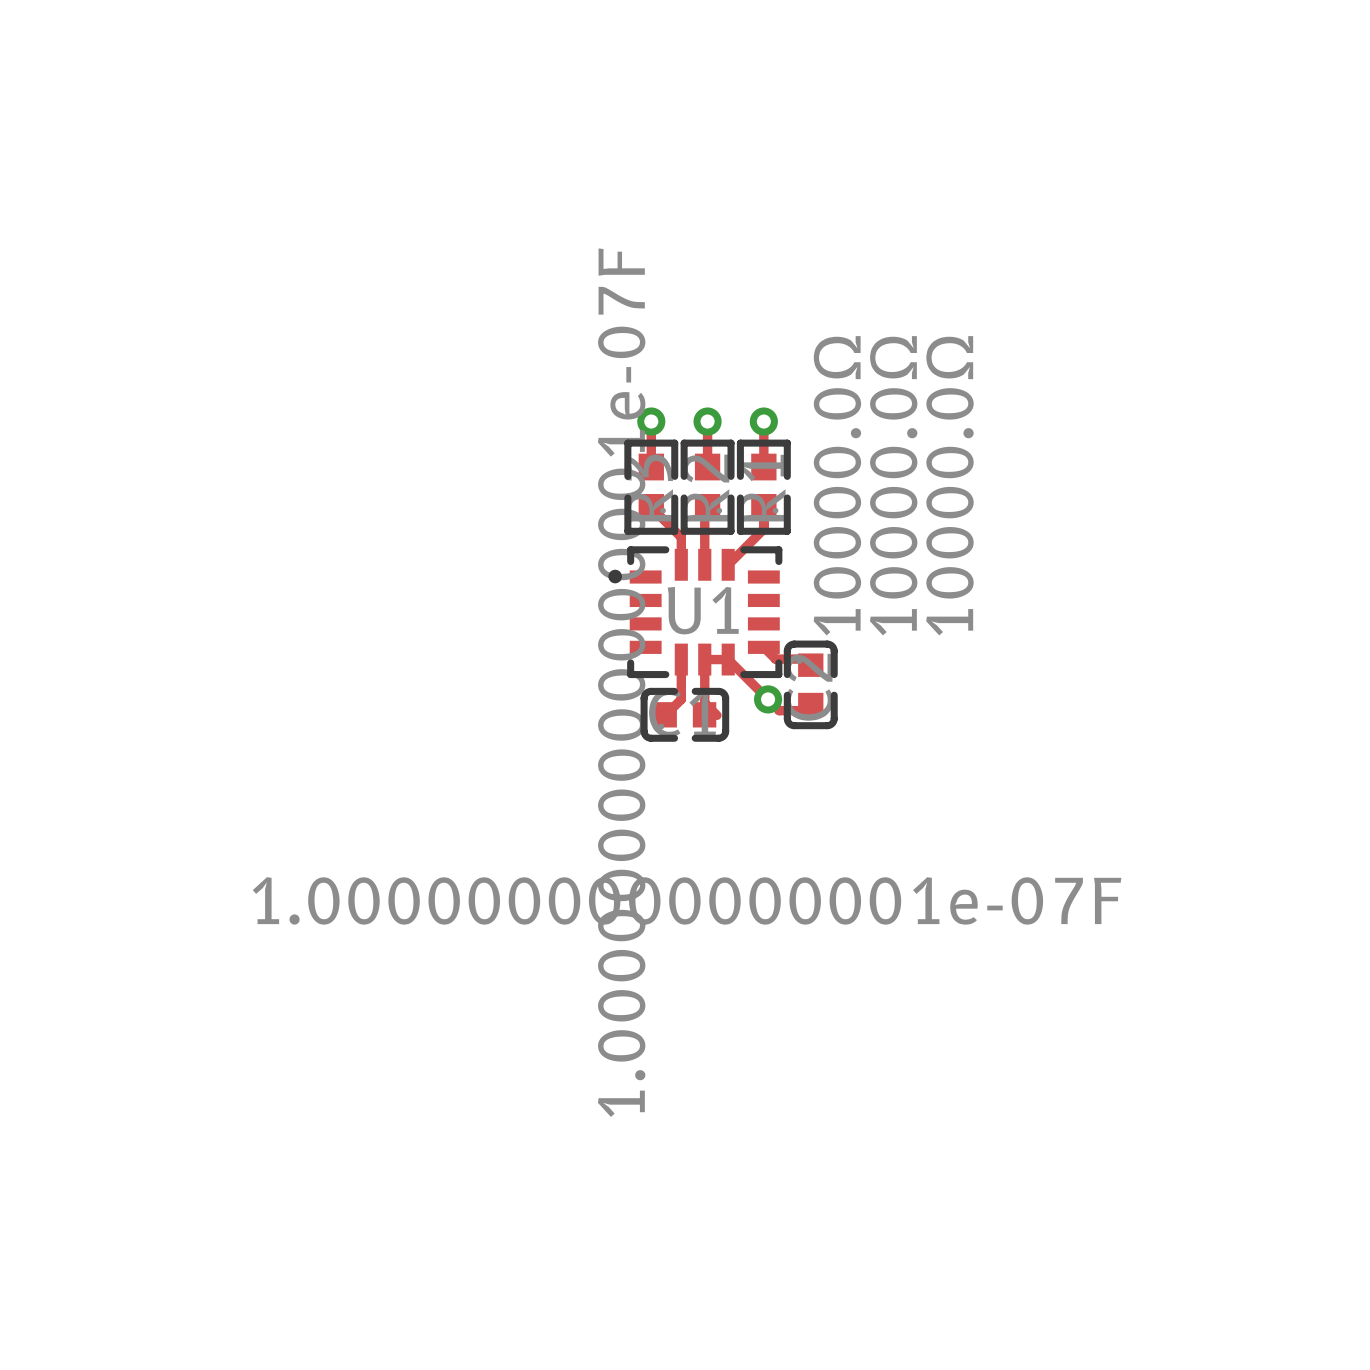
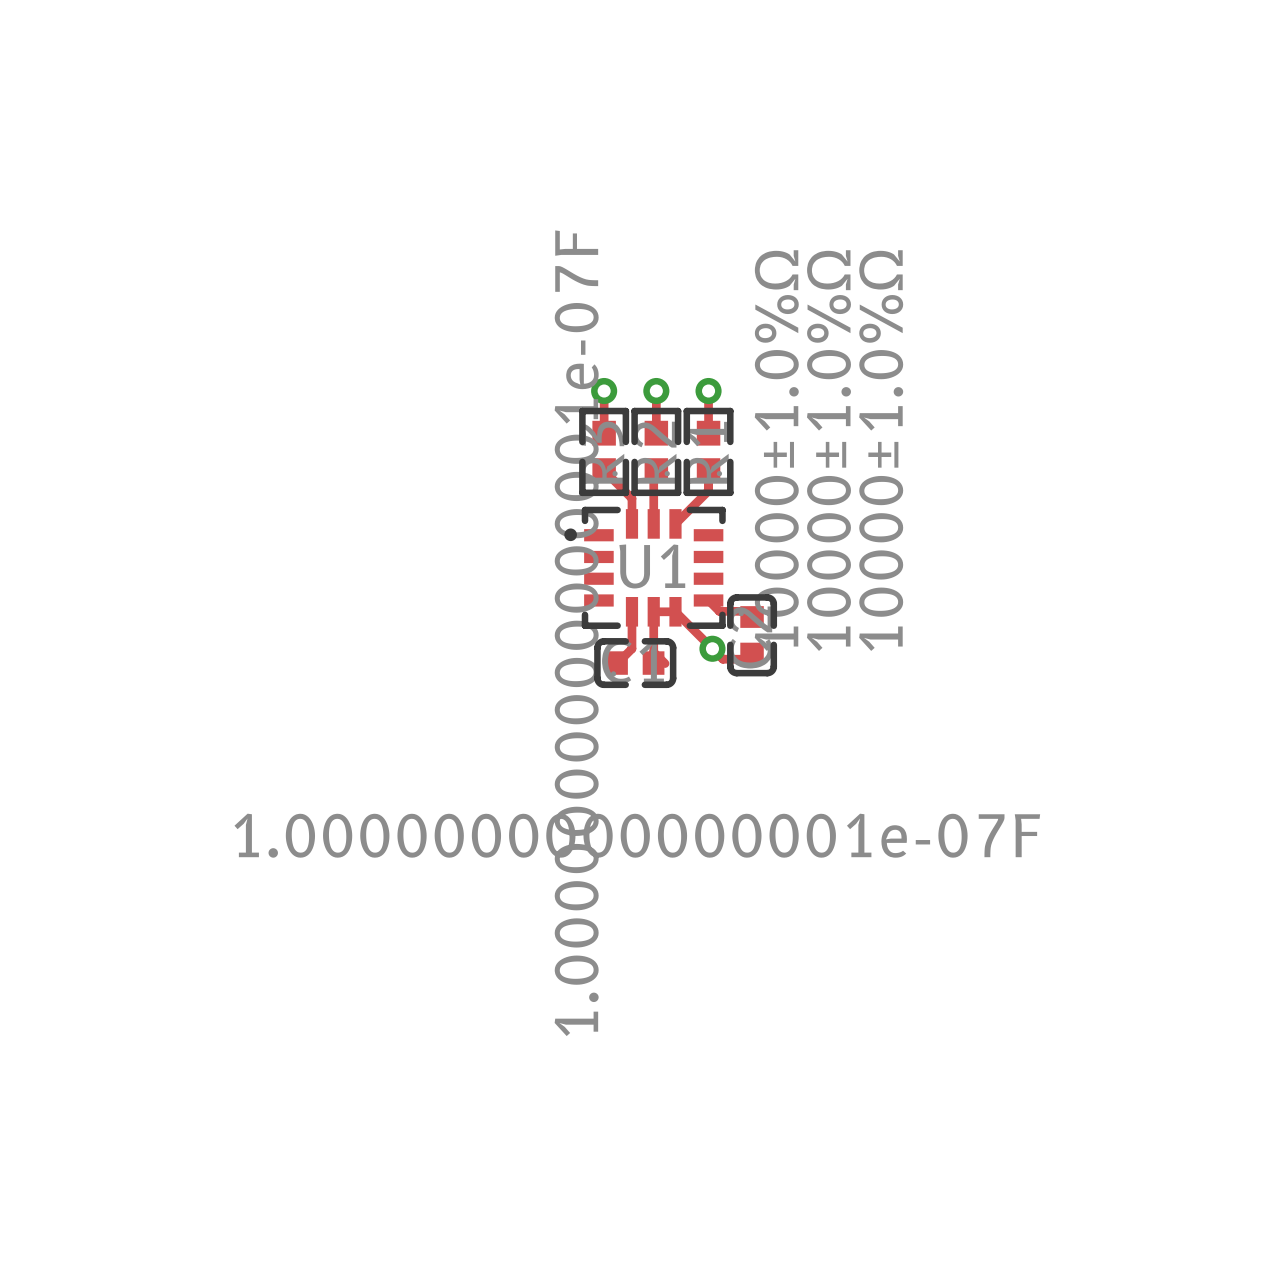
part value: 10000.0Ω (837, 485) -> 10000±1.0%Ω (776, 450)
part value: 10000.0Ω (893, 485) -> 10000±1.0%Ω (828, 450)
part value: 10000.0Ω (949, 485) -> 10000±1.0%Ω (881, 450)

